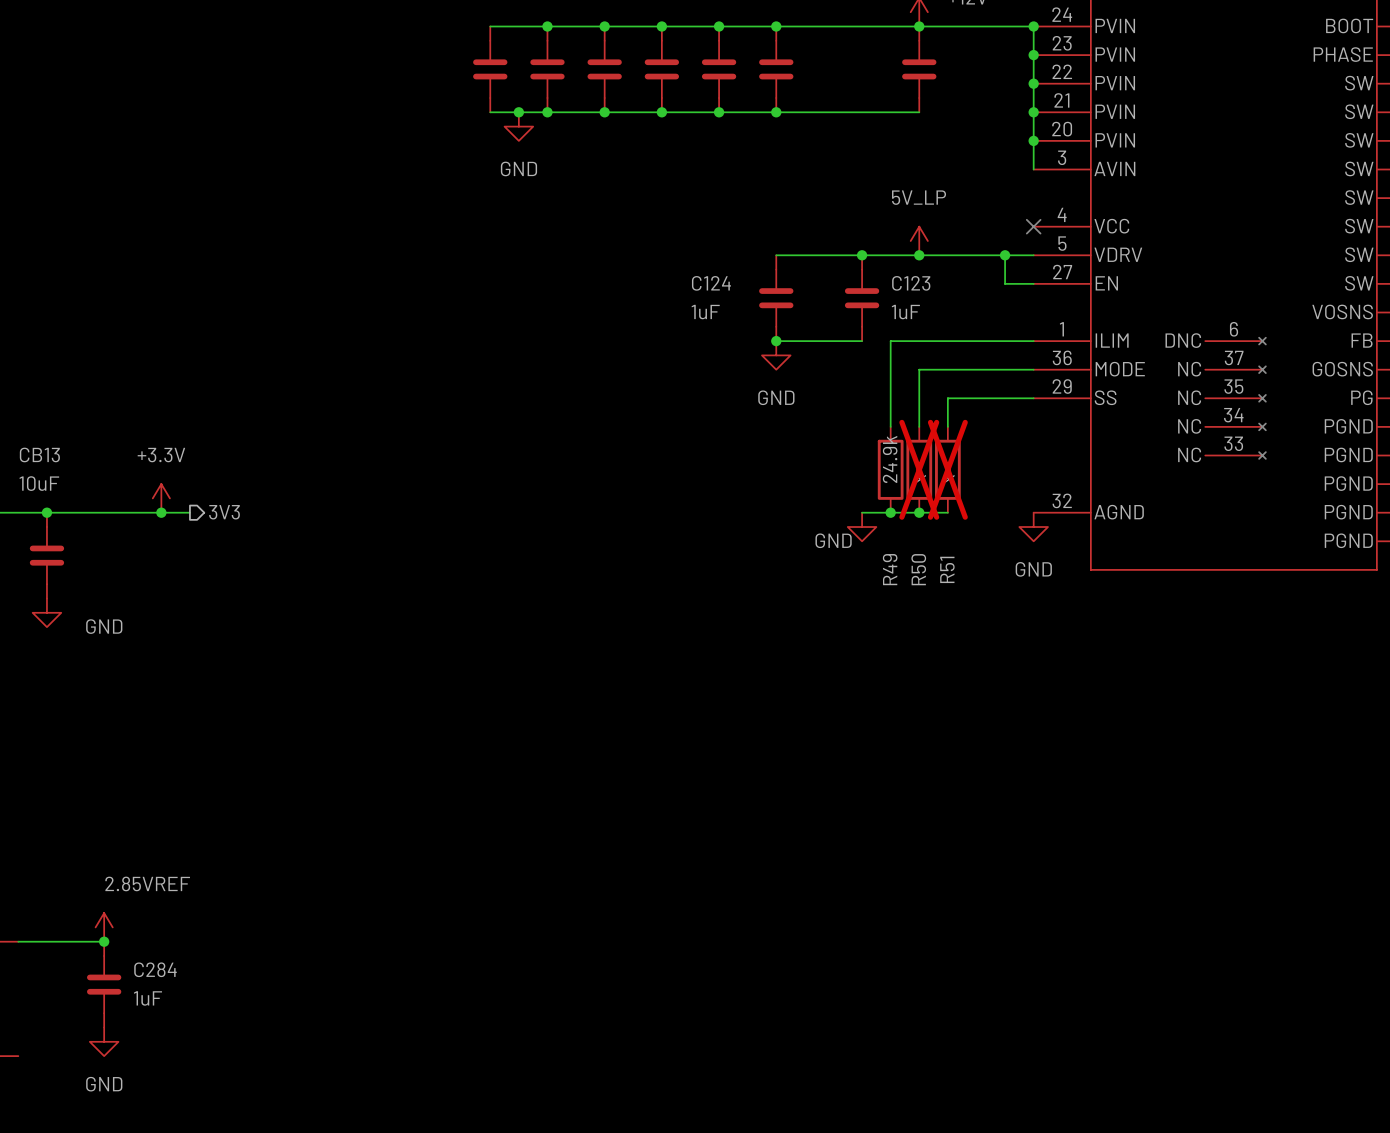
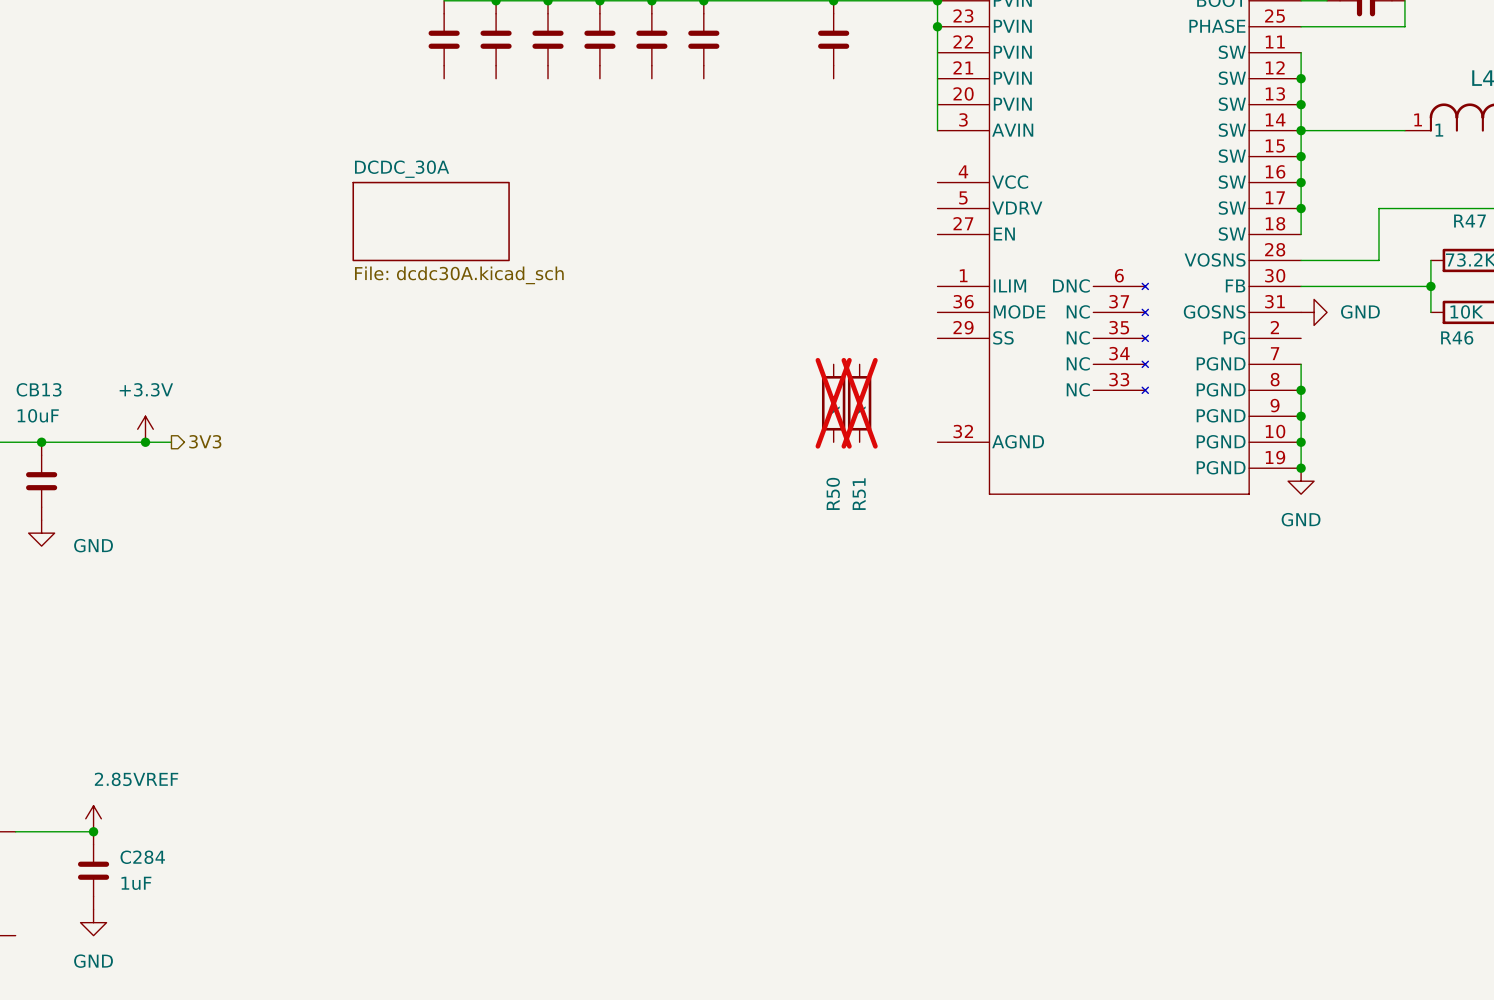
junction: (1033, 83) -> none
wire: (490, 112) (919, 112) -> none
junction: (518, 112) -> none
junction: (547, 112) -> none
junction: (604, 112) -> none
junction: (661, 112) -> none
junction: (719, 112) -> none
junction: (776, 112) -> none
junction: (1033, 112) -> none
power symbol: GND (518, 126) -> none
junction: (1033, 140) -> none
no-connect mark: (1033, 226) -> none
power symbol: 5V_LP (919, 241) -> none
wire: (776, 255) (1033, 255) -> none
junction: (862, 255) -> none
junction: (919, 255) -> none
wire: (1005, 255) (1005, 283) (1033, 283) -> none
junction: (1005, 255) -> none
sheet DCDC_30A: none -> File: dcdc30A.kicad_sch (431, 221)
C124: 1uF (776, 298) -> none
C123: 1uF (862, 298) -> none
wire: (776, 341) (862, 341) -> none
junction: (776, 341) -> none
wire: (1033, 341) (890, 341) (890, 426) -> none
power symbol: GND (776, 355) -> none
wire: (1033, 369) (919, 369) (919, 426) -> none
wire: (1033, 398) (947, 398) (947, 426) -> none
R49: 24.9k (890, 469) -> none
wire: (862, 512) (947, 512) -> none
junction: (890, 512) -> none
junction: (919, 512) -> none
power symbol: GND (862, 527) -> none
power symbol: GND (1033, 527) -> none

